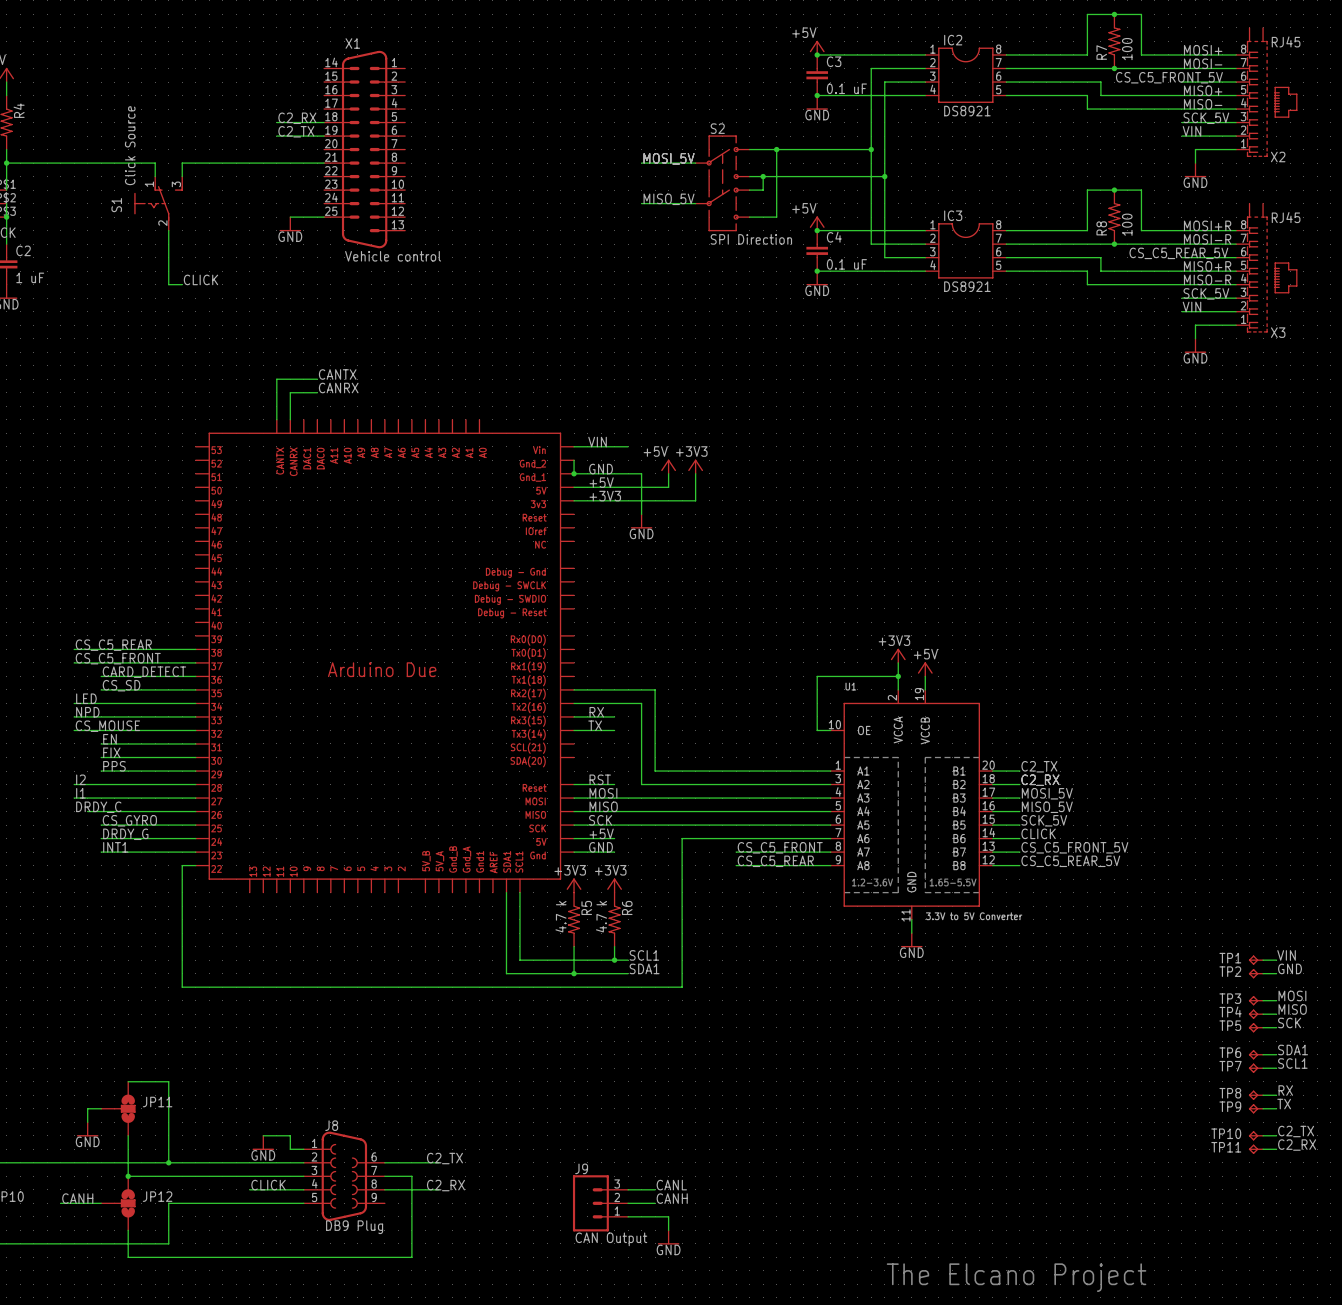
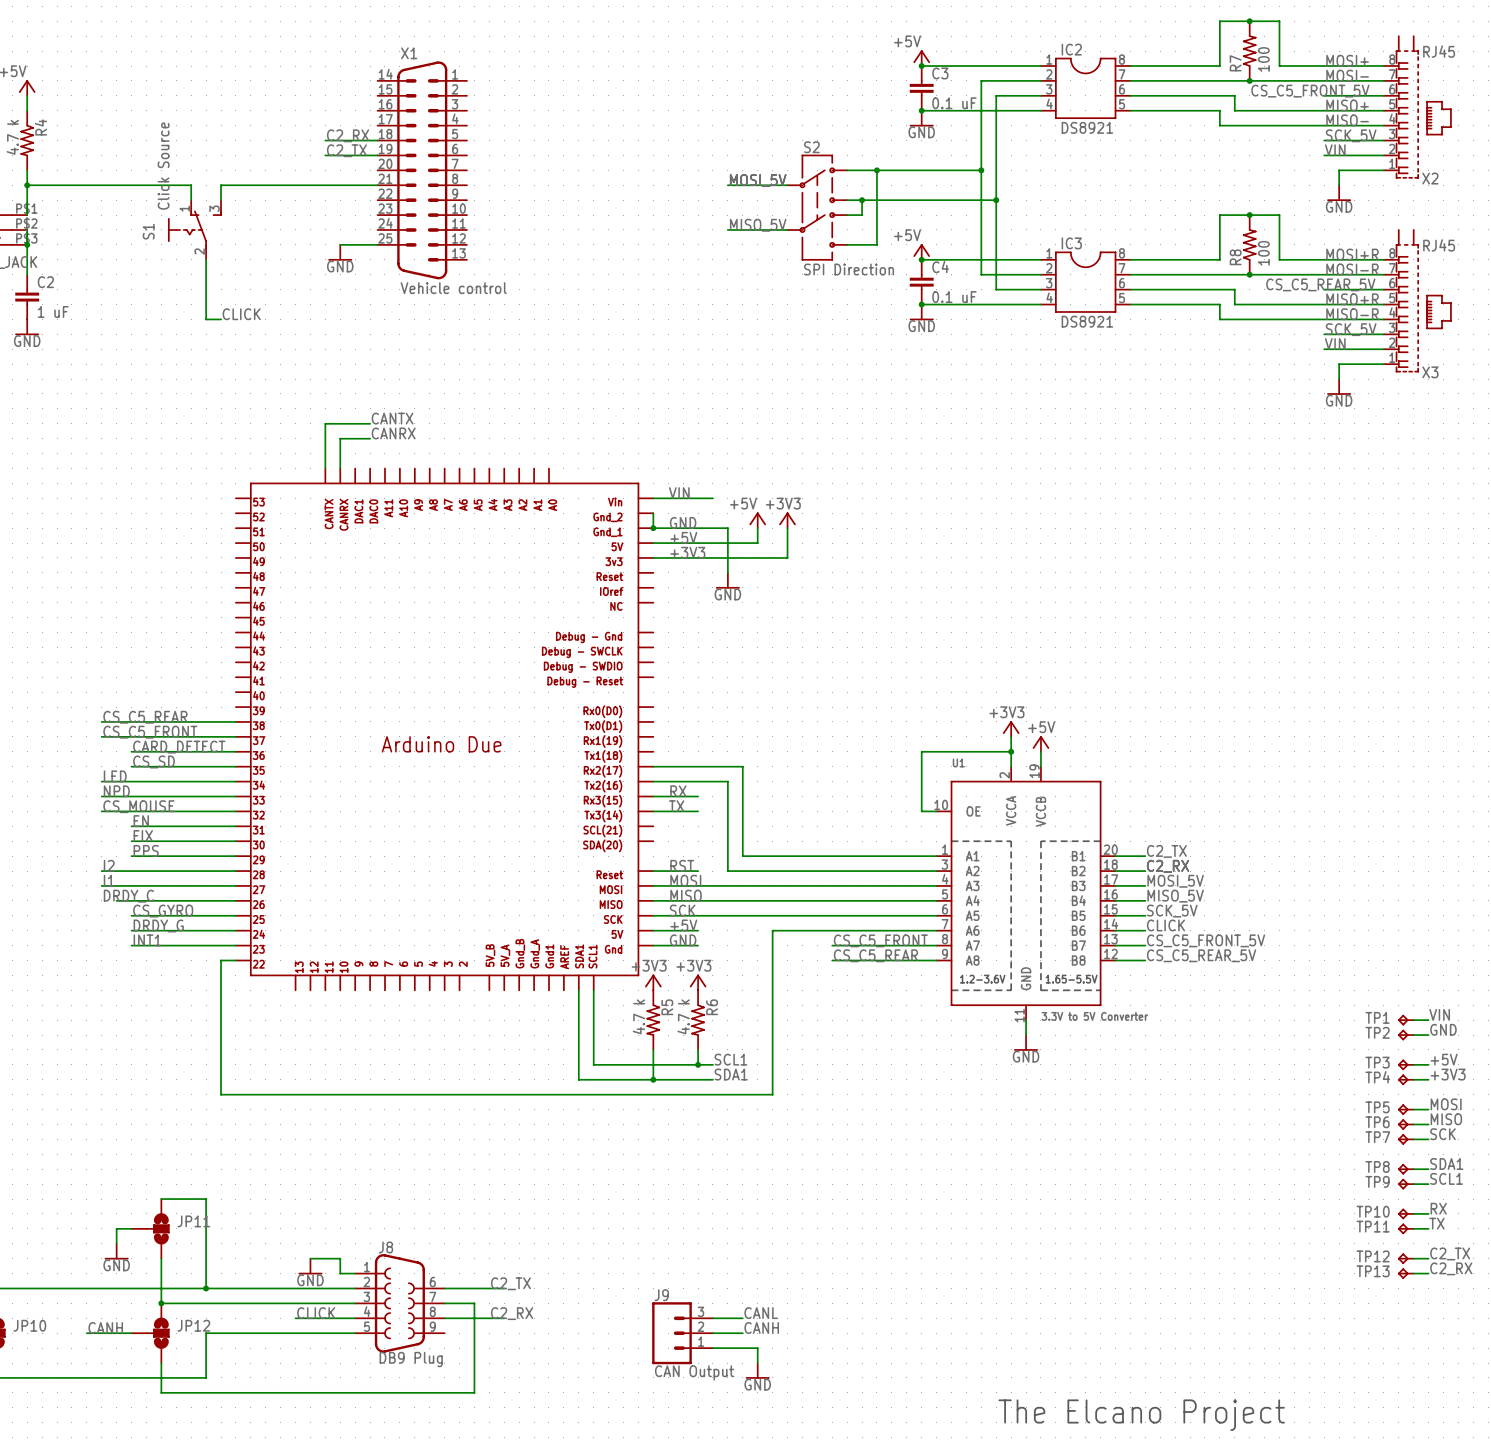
label: none -> VIN (1439, 1014)
TP1: none -> (1405, 1020)
wire: none -> (1413, 1020) (1428, 1020)
label: none -> GND (1443, 1029)
TP2: none -> (1405, 1035)
wire: none -> (1413, 1035) (1428, 1035)
label: VIN (1286, 955) -> +5V (1444, 1059)
TP1 name: TP1 (1230, 958) -> TP3 (1377, 1062)
label: GND (1290, 968) -> +3V3 (1448, 1074)
TP2 name: TP2 (1230, 971) -> TP4 (1377, 1077)
TP3 name: TP3 (1230, 998) -> TP5 (1377, 1107)
TP4 name: TP4 (1230, 1011) -> TP6 (1377, 1122)
TP5 name: TP5 (1230, 1025) -> TP7 (1377, 1137)
TP6 name: TP6 (1230, 1052) -> TP8 (1377, 1166)
TP7 name: TP7 (1230, 1066) -> TP9 (1377, 1181)
TP8 name: TP8 (1230, 1093) -> TP10 (1373, 1211)
TP9 name: TP9 (1230, 1106) -> TP11 (1373, 1226)
TP10 name: TP10 (1226, 1133) -> TP12 (1373, 1256)
TP11 name: TP11 (1226, 1147) -> TP13 (1373, 1271)

